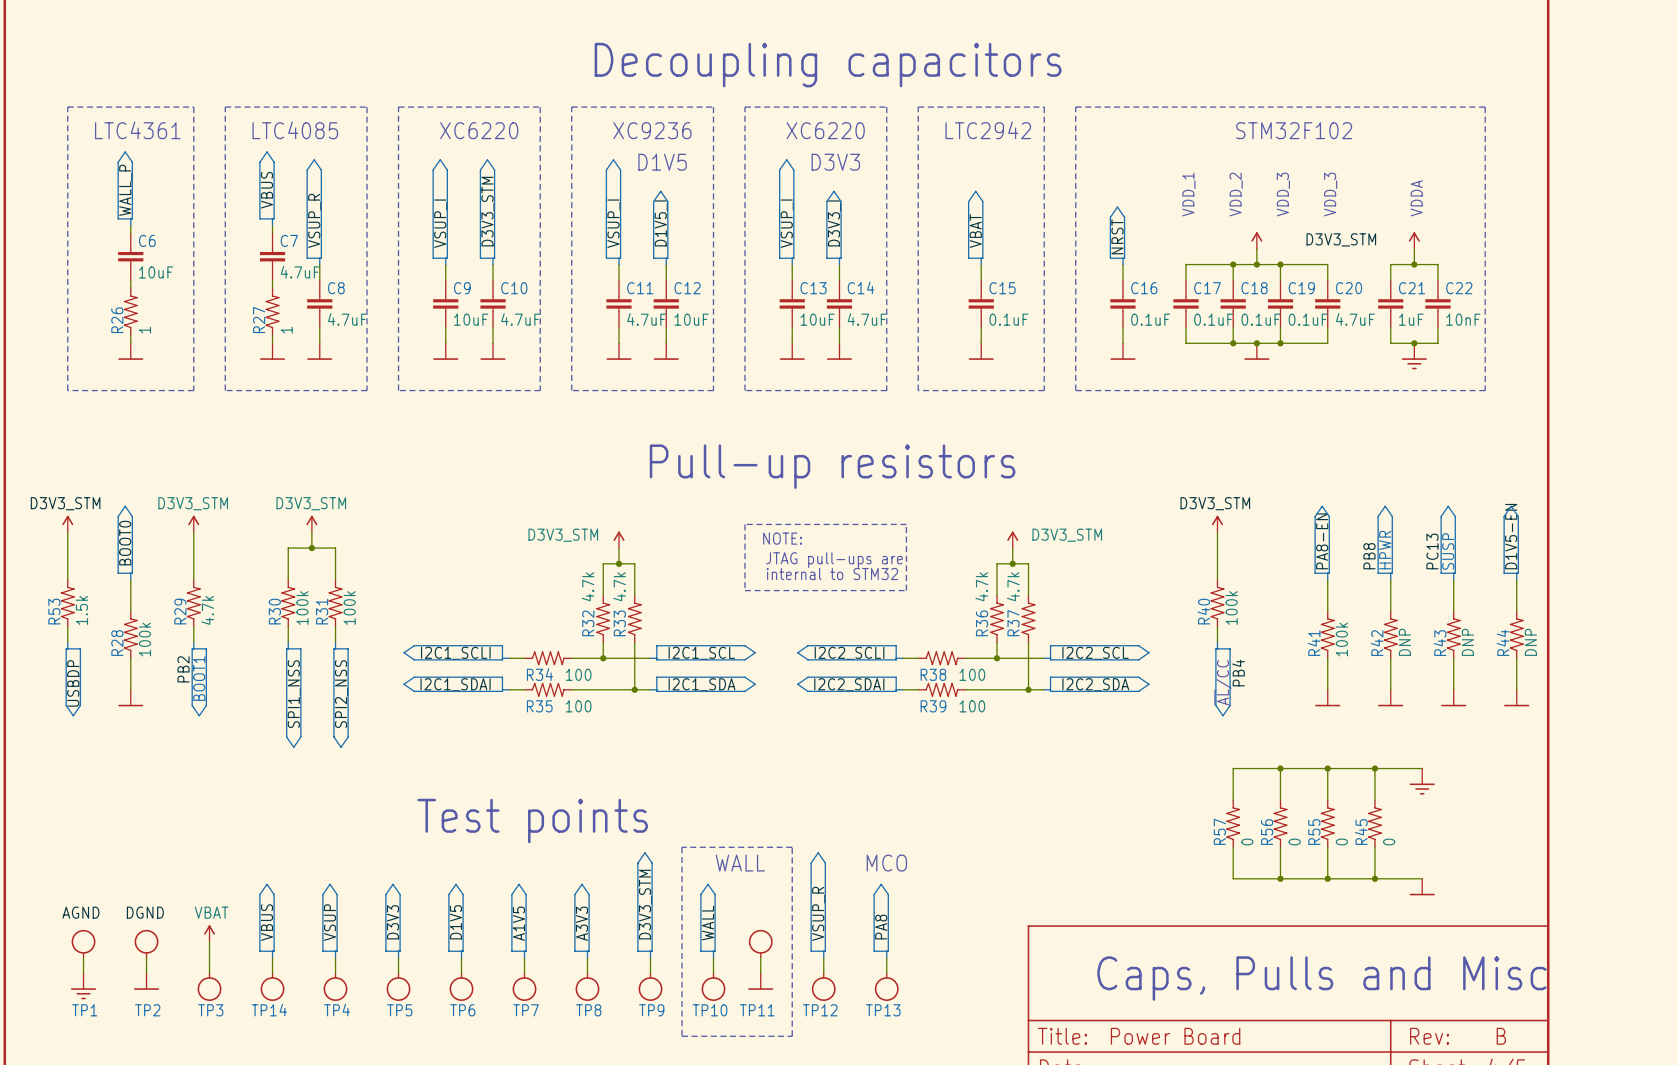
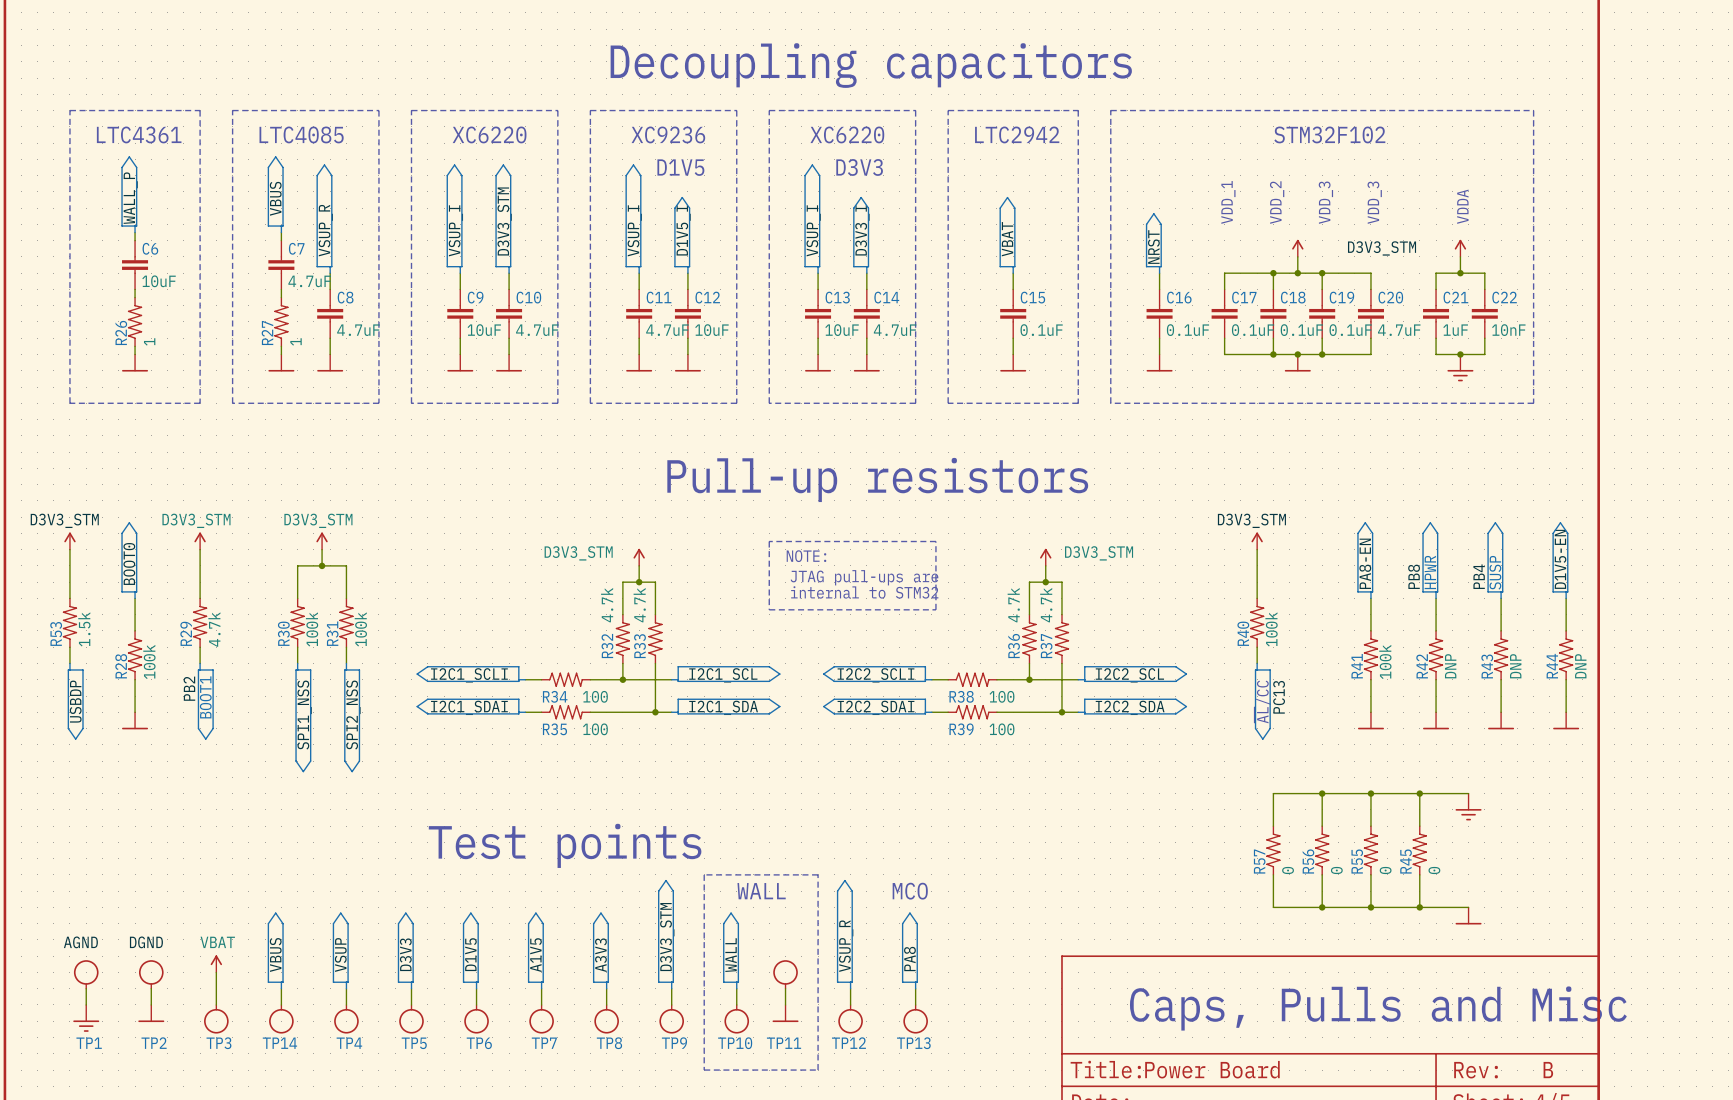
label: PC13 (1432, 551) -> PB4 (1479, 576)
label: PB4 (1238, 673) -> PC13 (1279, 697)

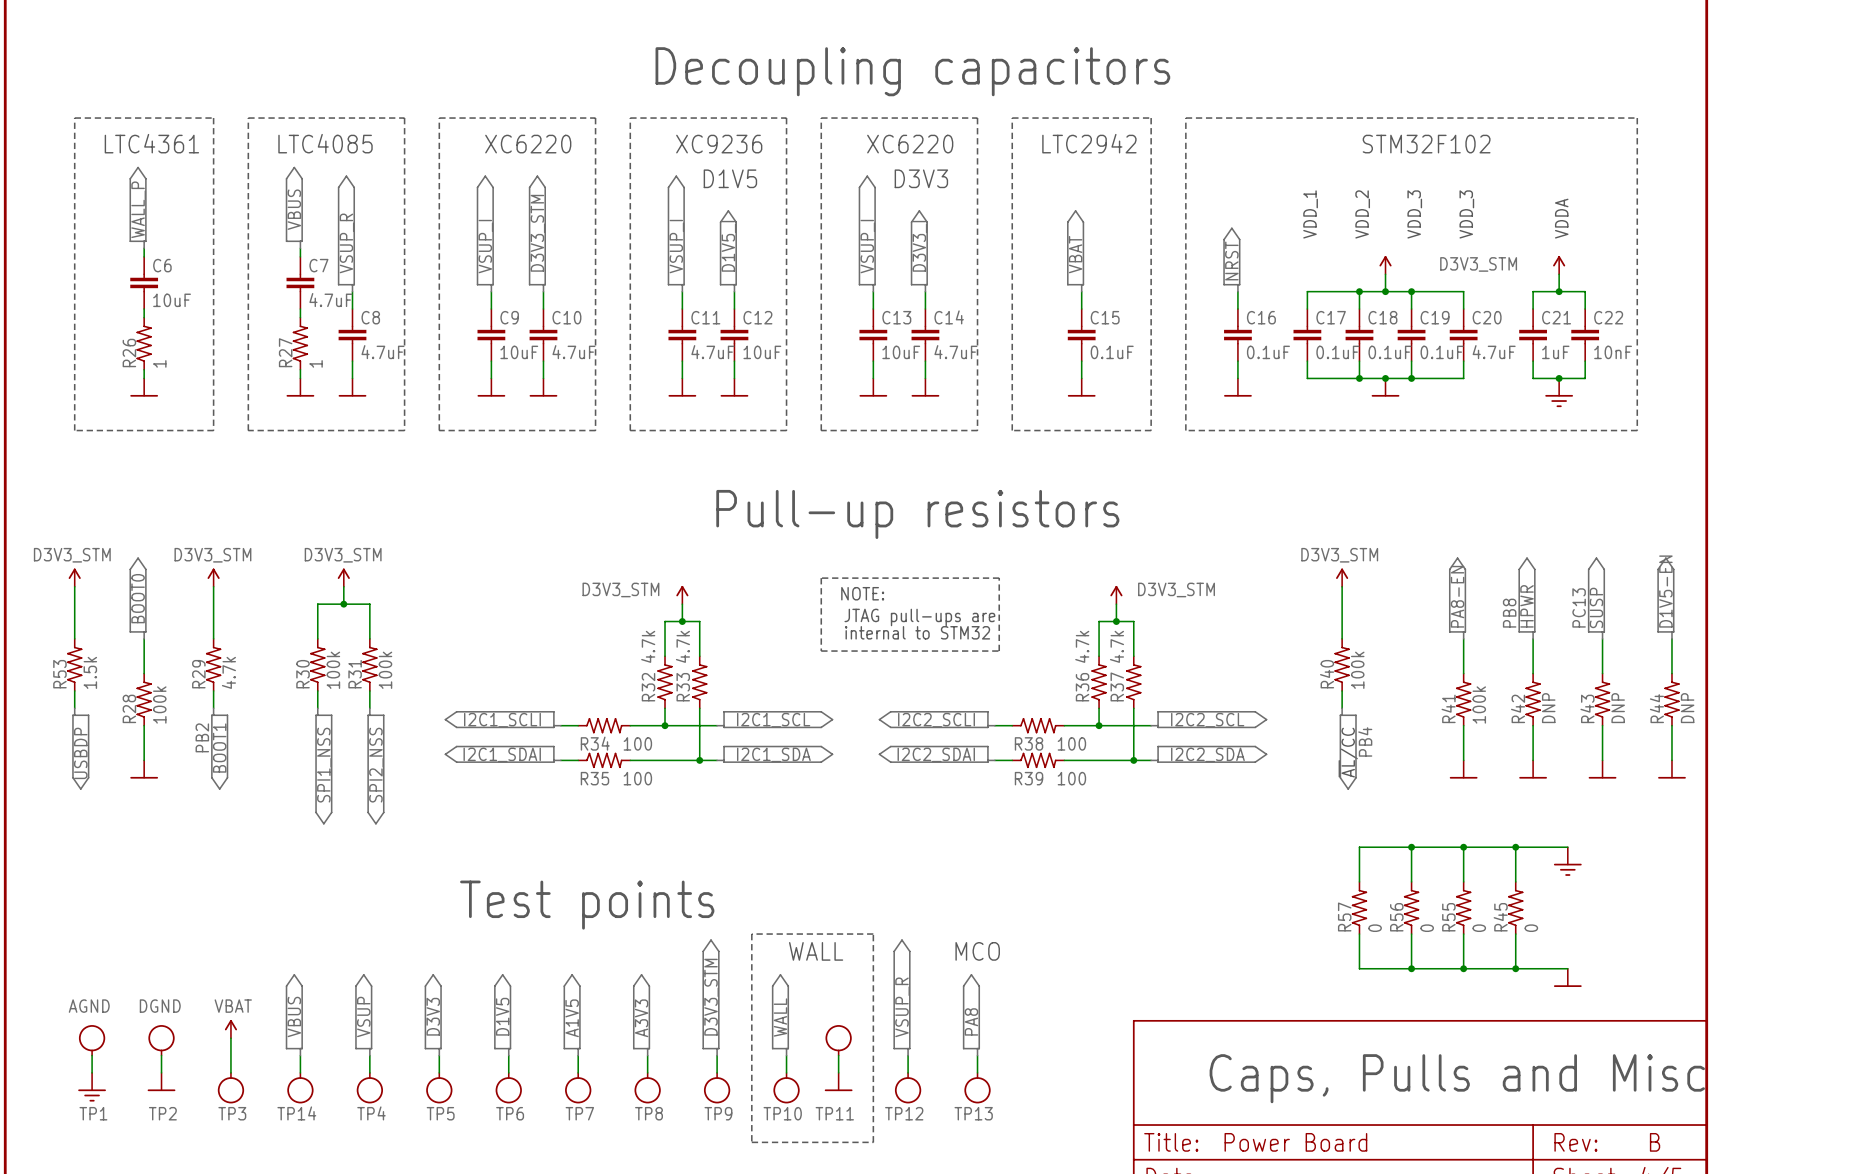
label: PB4 (1479, 576) -> PC13 (1579, 607)
label: PC13 (1279, 697) -> PB4 (1365, 741)

